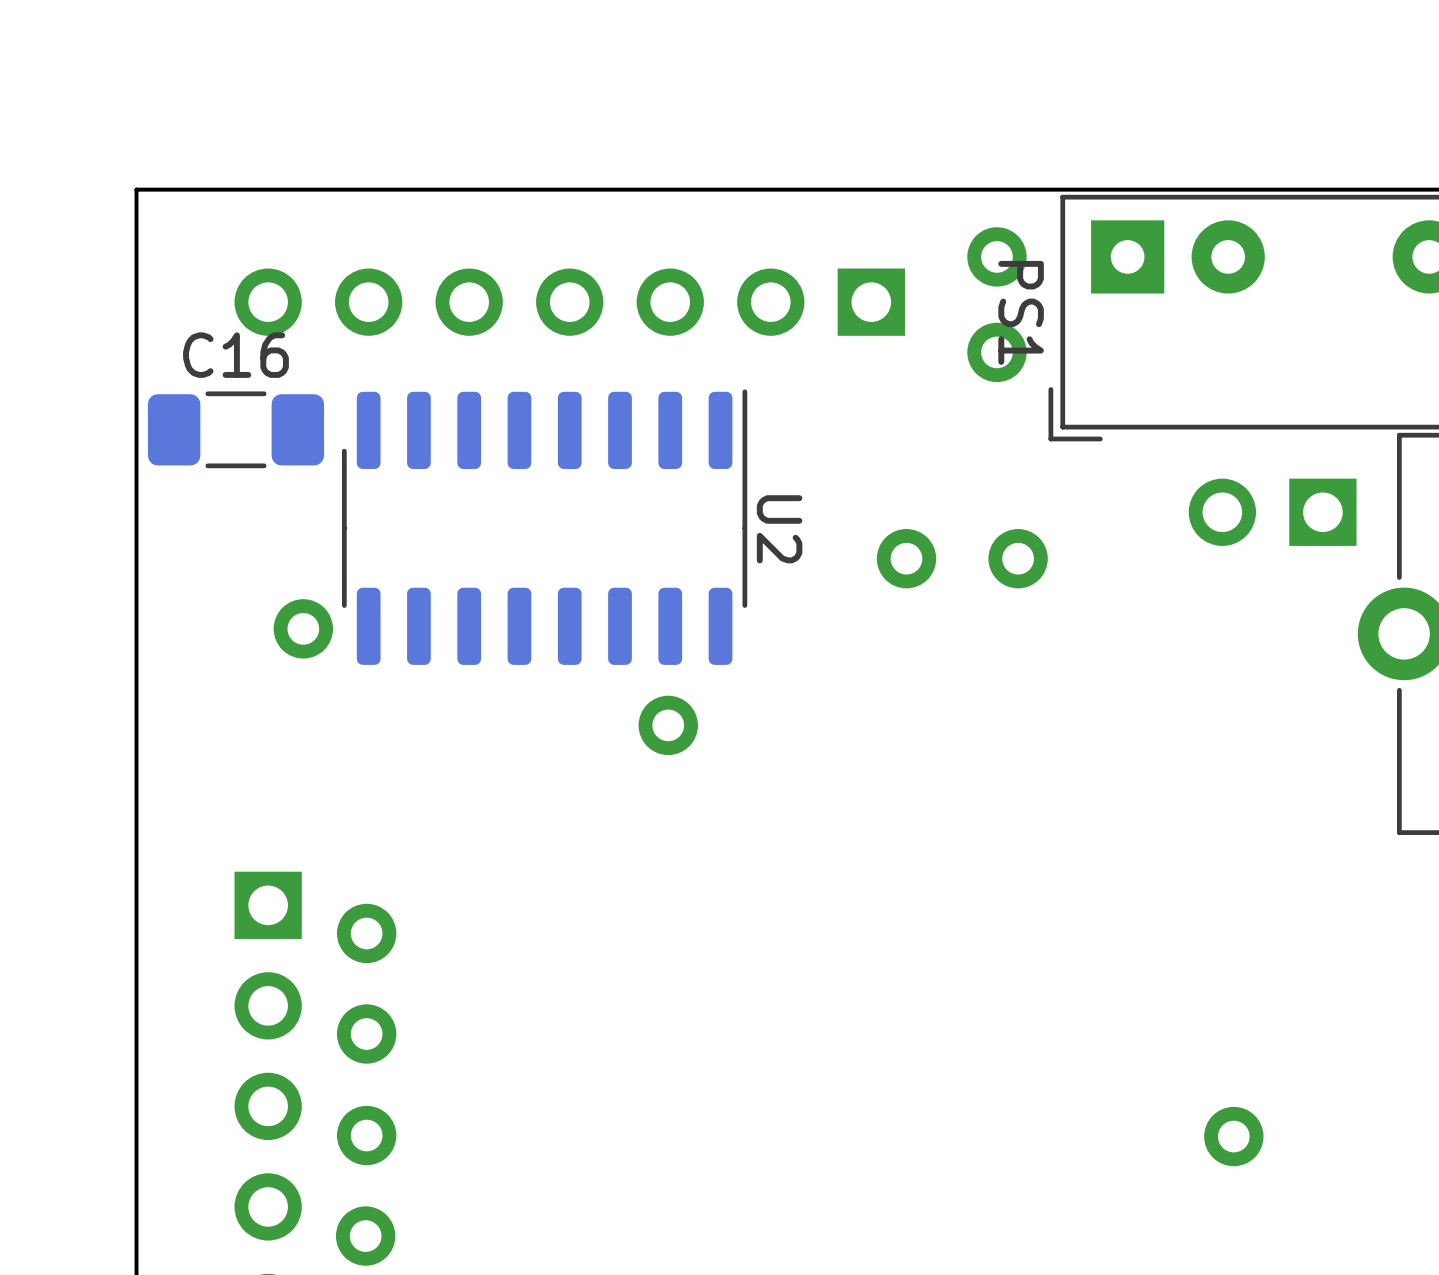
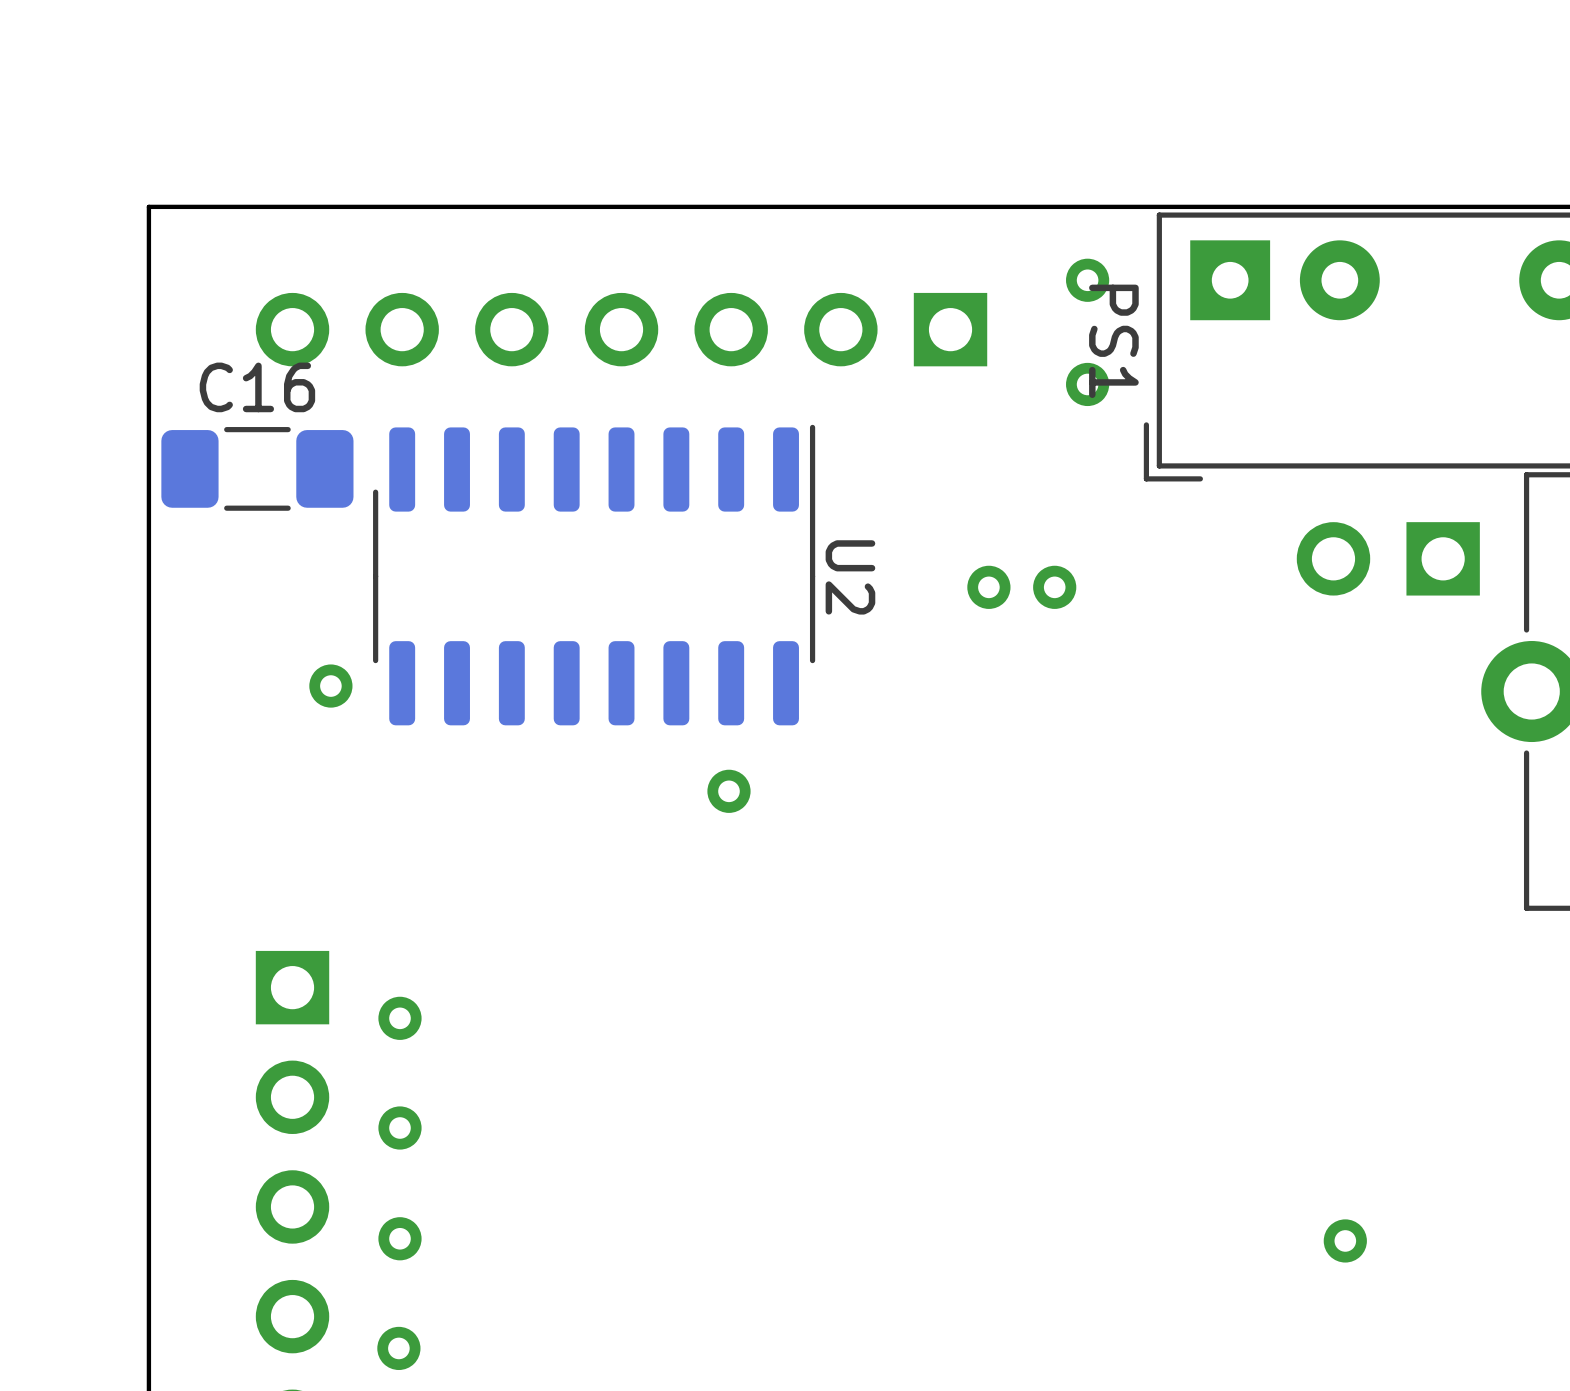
part footprint: [967, 227, 1027, 287] -> [1066, 258, 1110, 302]
part footprint: [967, 322, 1027, 383] -> [1066, 362, 1110, 407]
part footprint: [876, 529, 937, 589] -> [967, 565, 1011, 609]
part: none -> (1054, 587)
part: (1018, 558) -> none
part footprint: [273, 599, 334, 659] -> [309, 664, 353, 708]
part footprint: [638, 695, 698, 756] -> [707, 769, 751, 813]
part footprint: [336, 903, 397, 964] -> [378, 996, 422, 1040]
part footprint: [336, 1004, 397, 1064] -> [378, 1106, 422, 1150]
part footprint: [336, 1105, 397, 1166] -> [378, 1217, 422, 1261]
part footprint: [1204, 1106, 1264, 1167] -> [1323, 1219, 1367, 1263]
part footprint: [335, 1206, 396, 1266] -> [377, 1326, 421, 1371]

